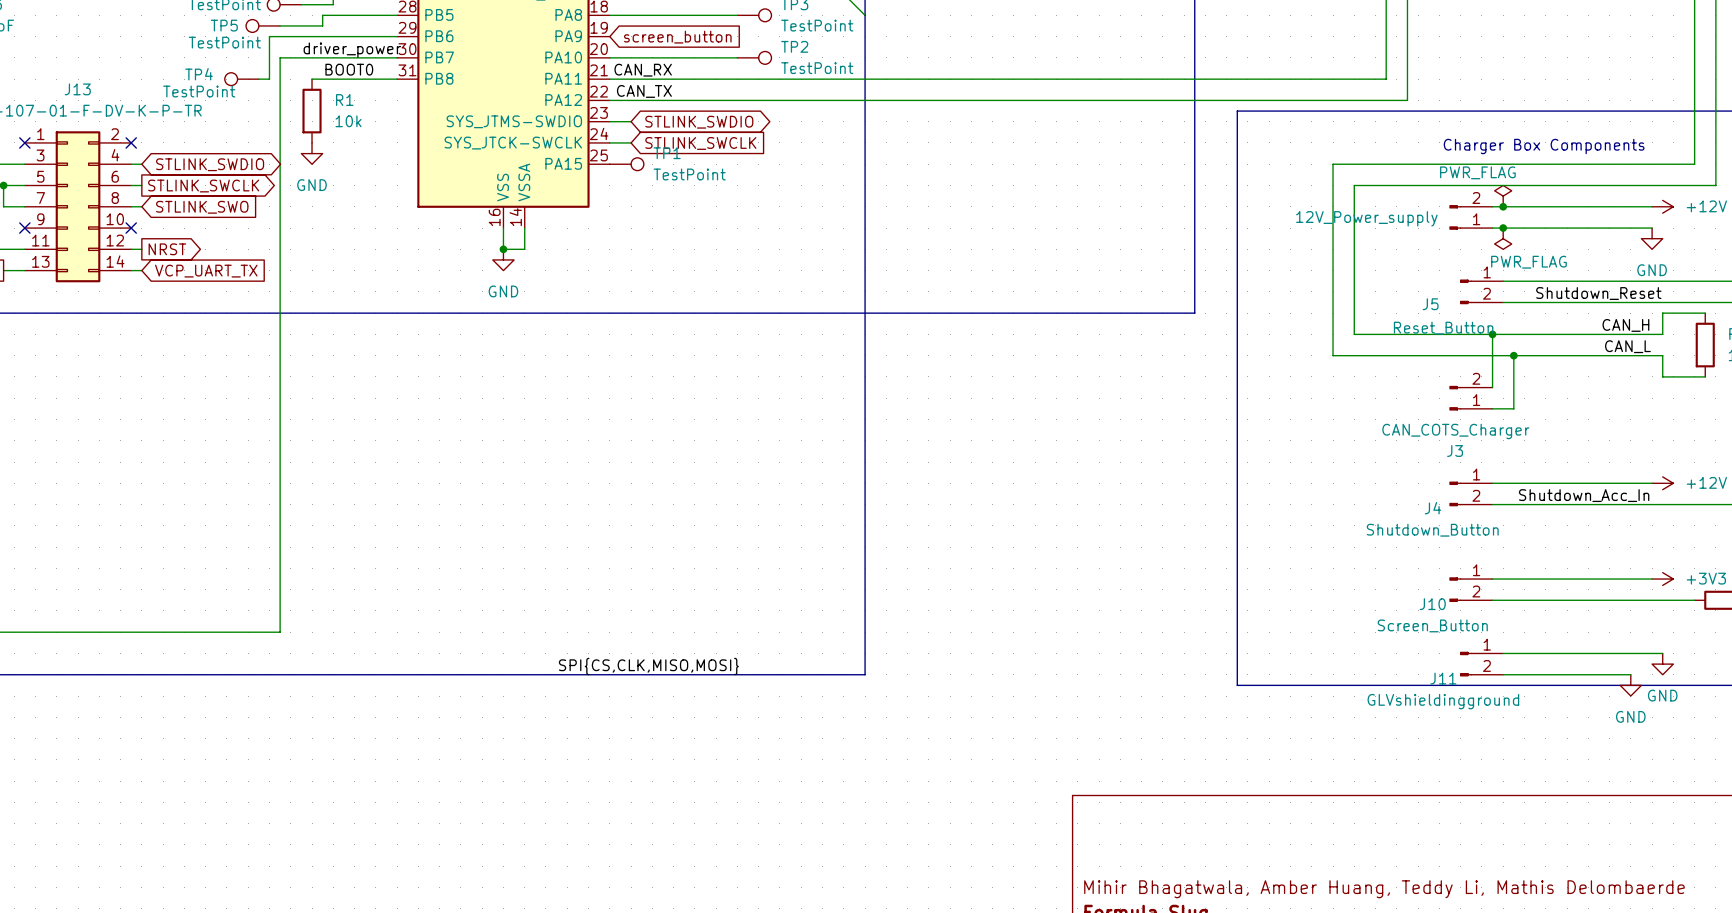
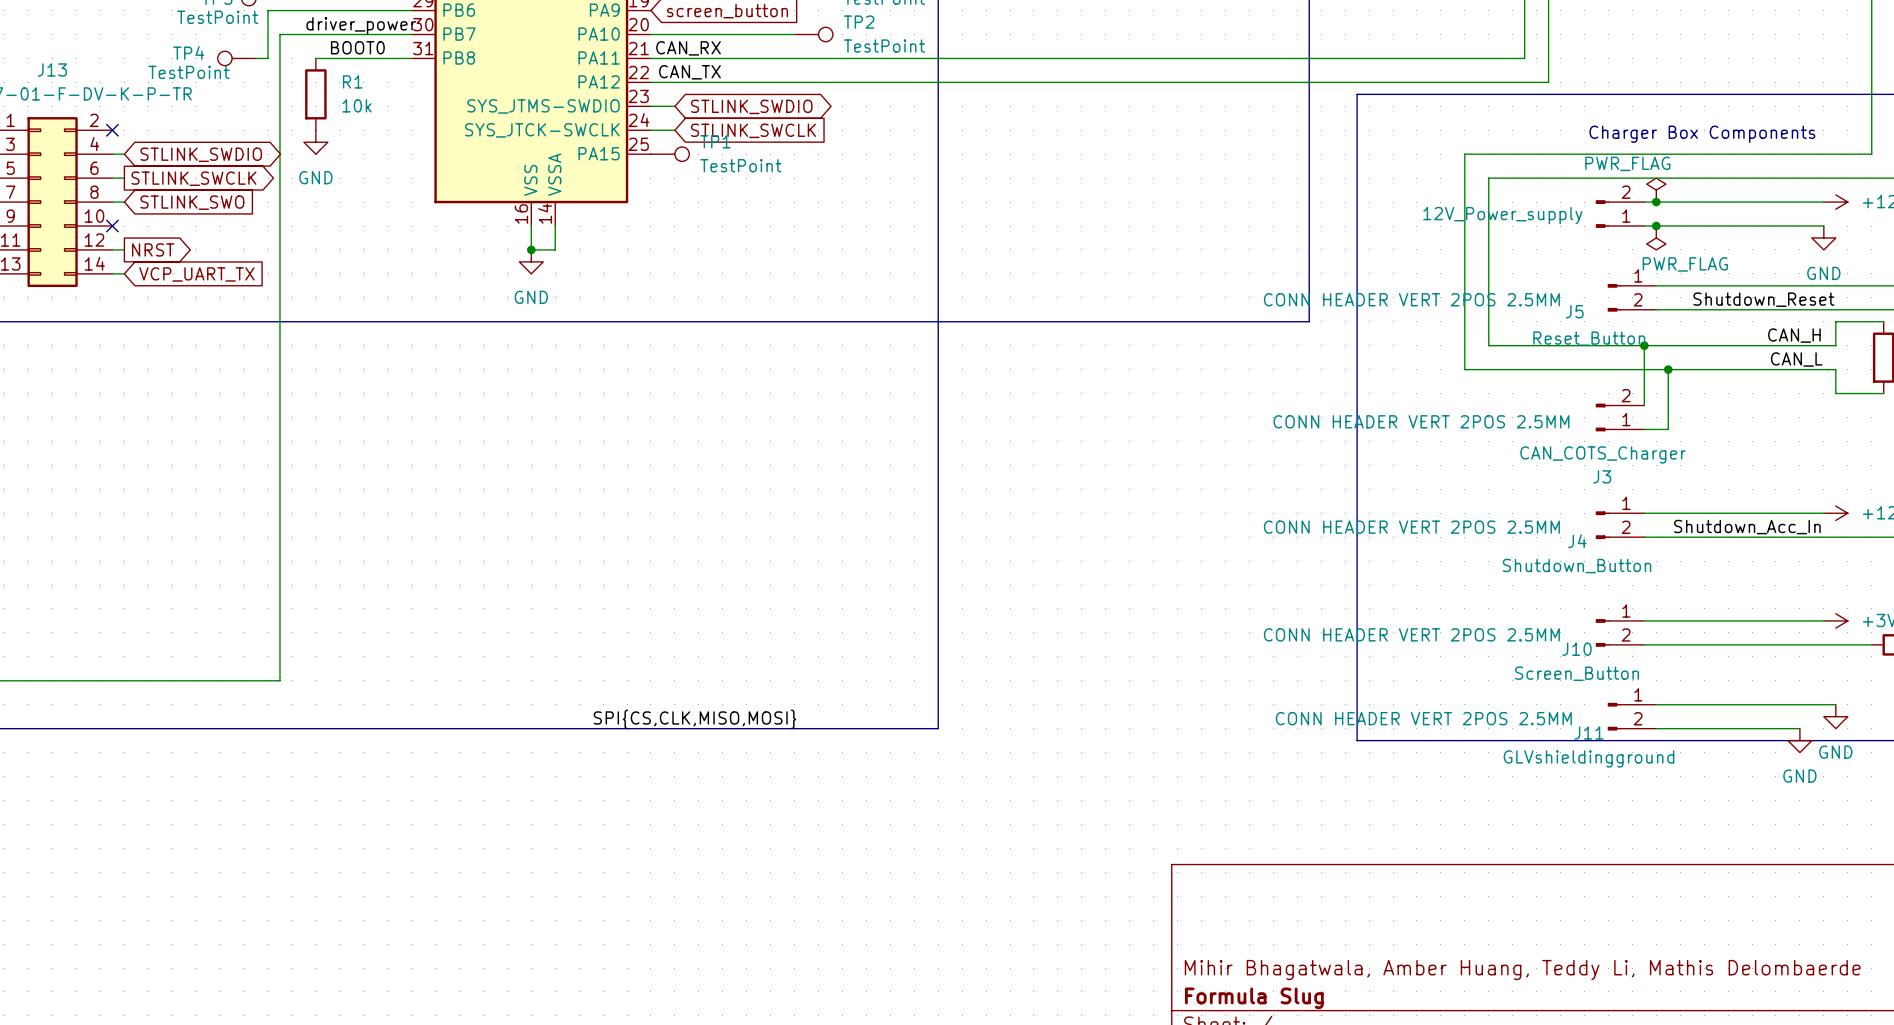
J5 text: none -> CONN HEADER VERT 2POS 2.5MM (1411, 299)
J3 text: none -> CONN HEADER VERT 2POS 2.5MM (1421, 421)
J4 text: none -> CONN HEADER VERT 2POS 2.5MM (1411, 527)
J10 text: none -> CONN HEADER VERT 2POS 2.5MM (1411, 634)
J11 text: none -> CONN HEADER VERT 2POS 2.5MM (1423, 718)

